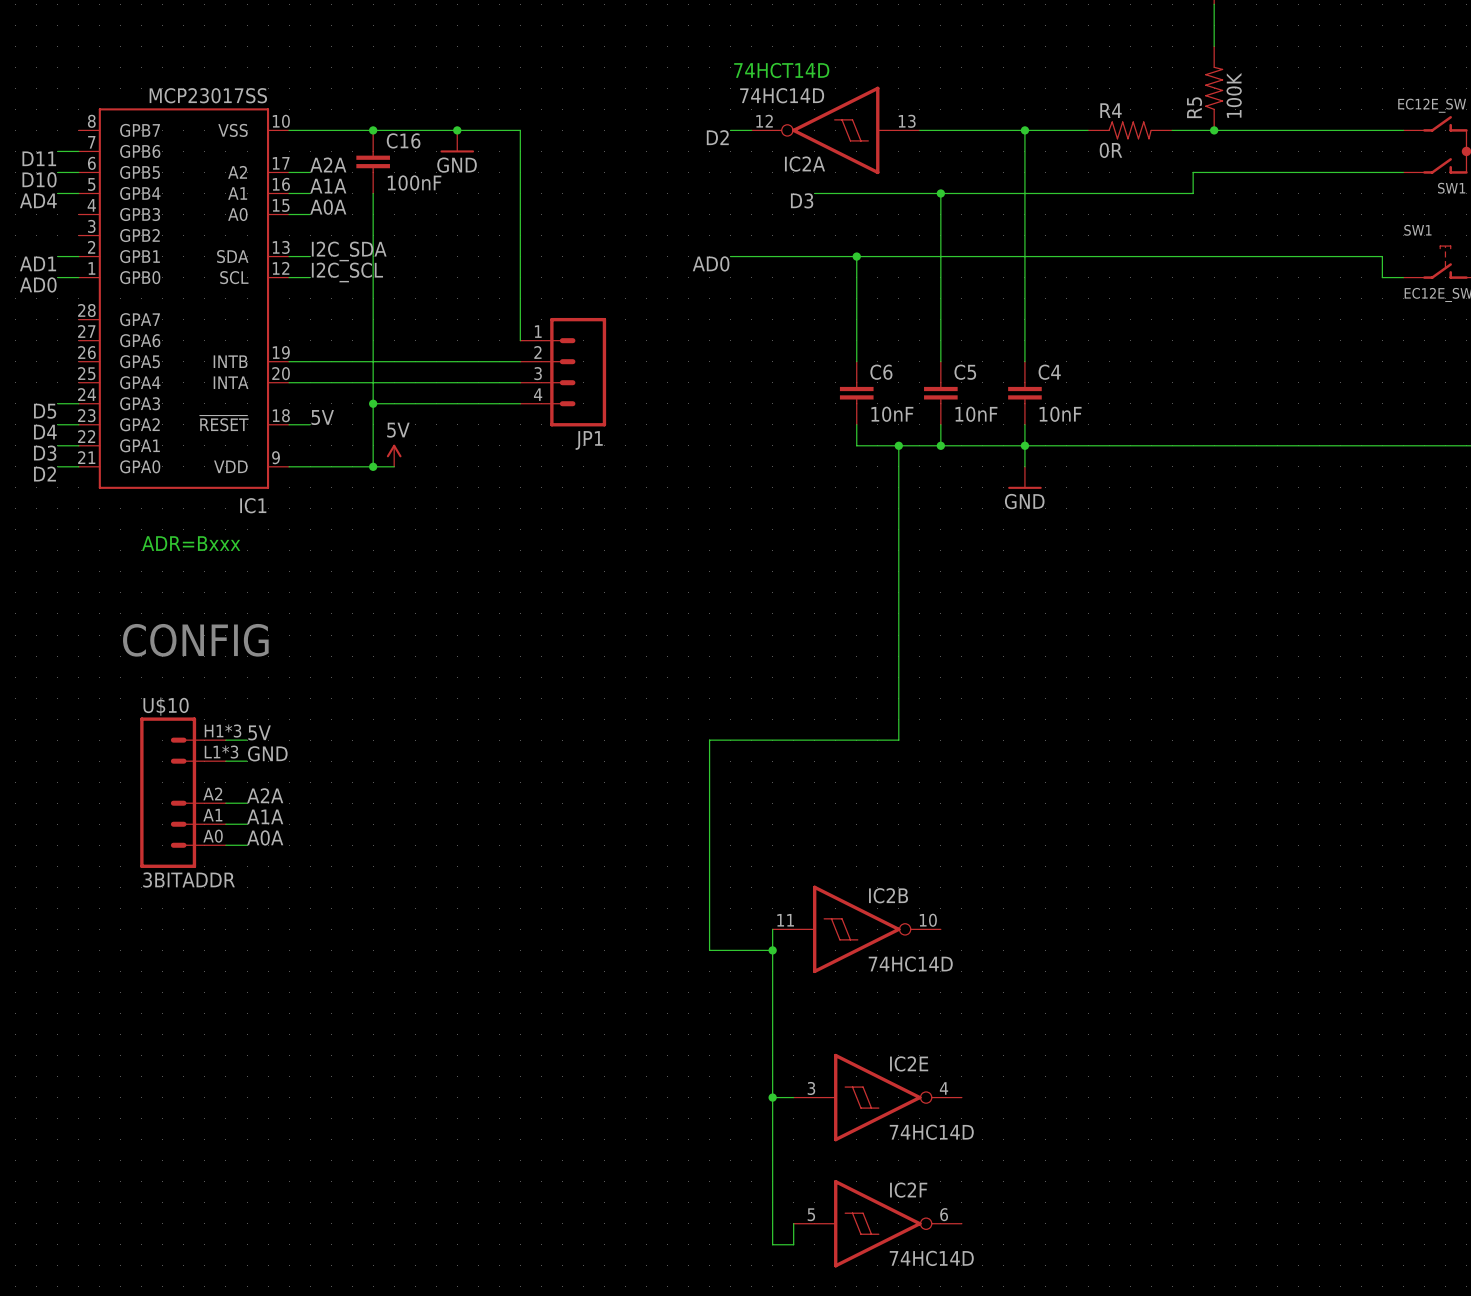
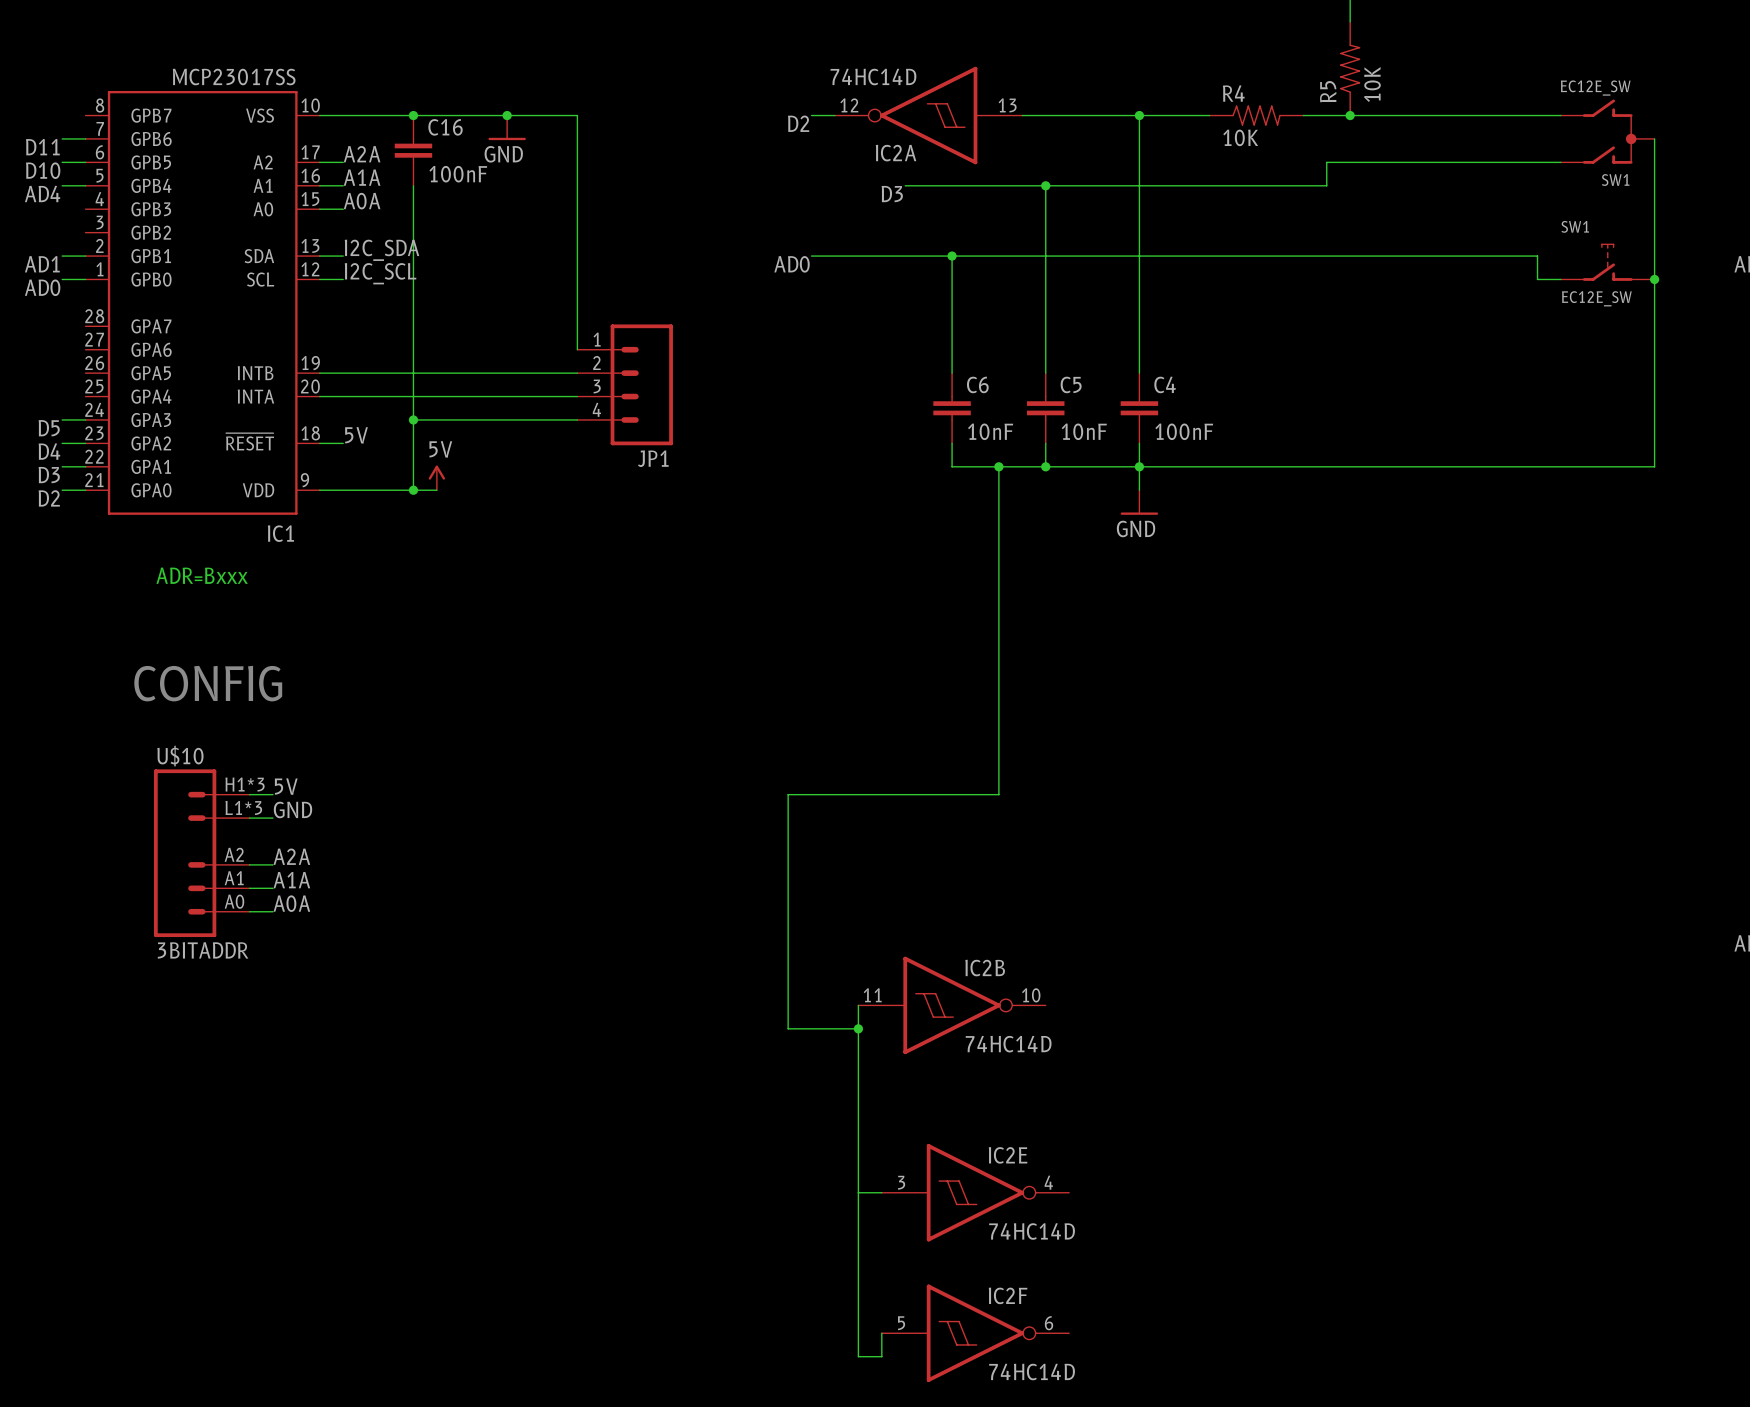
text: 74HCT14D (781, 70) -> none
R5 value: 100K (1234, 95) -> 10K (1372, 84)
R4 value: 0R (1110, 150) -> 10K (1240, 137)
C4 value: 10nF (1060, 414) -> 100nF (1184, 431)
junction: (772, 1097) -> none

